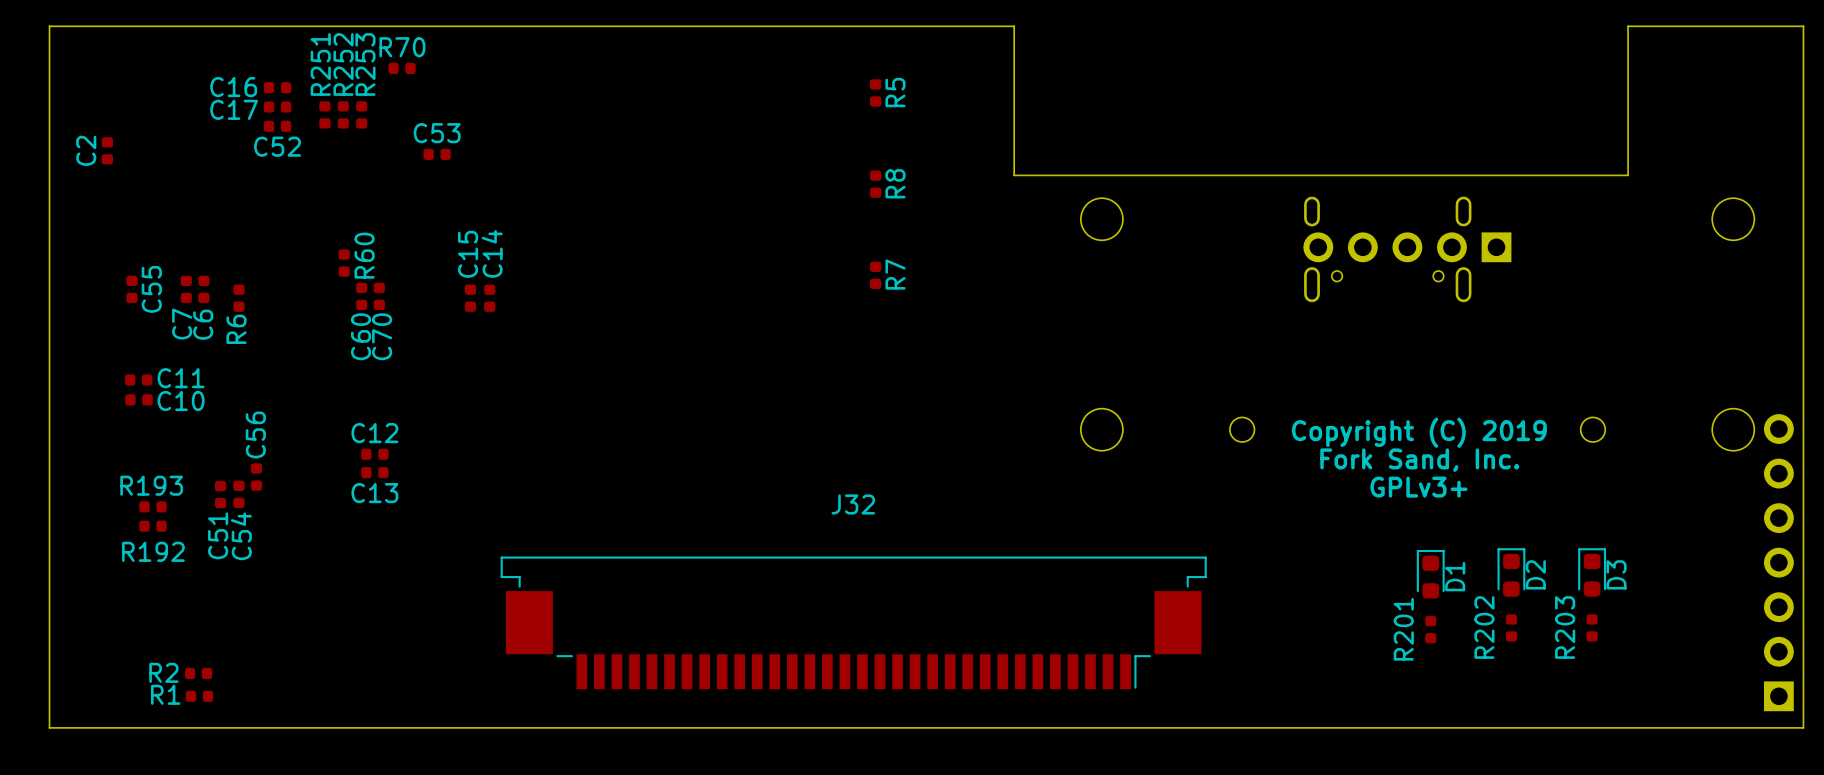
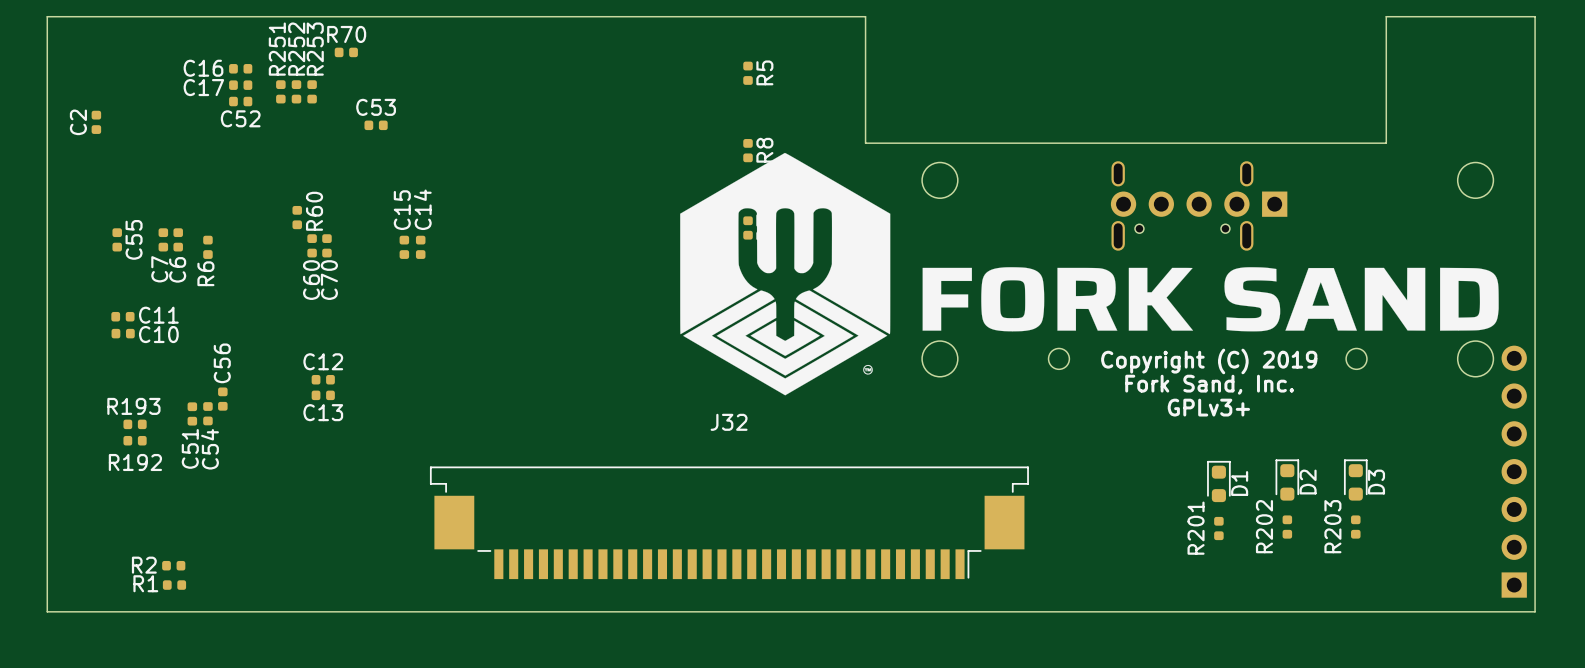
drawing: none -> [680, 152, 891, 396]
drawing: none -> [922, 267, 1499, 332]

